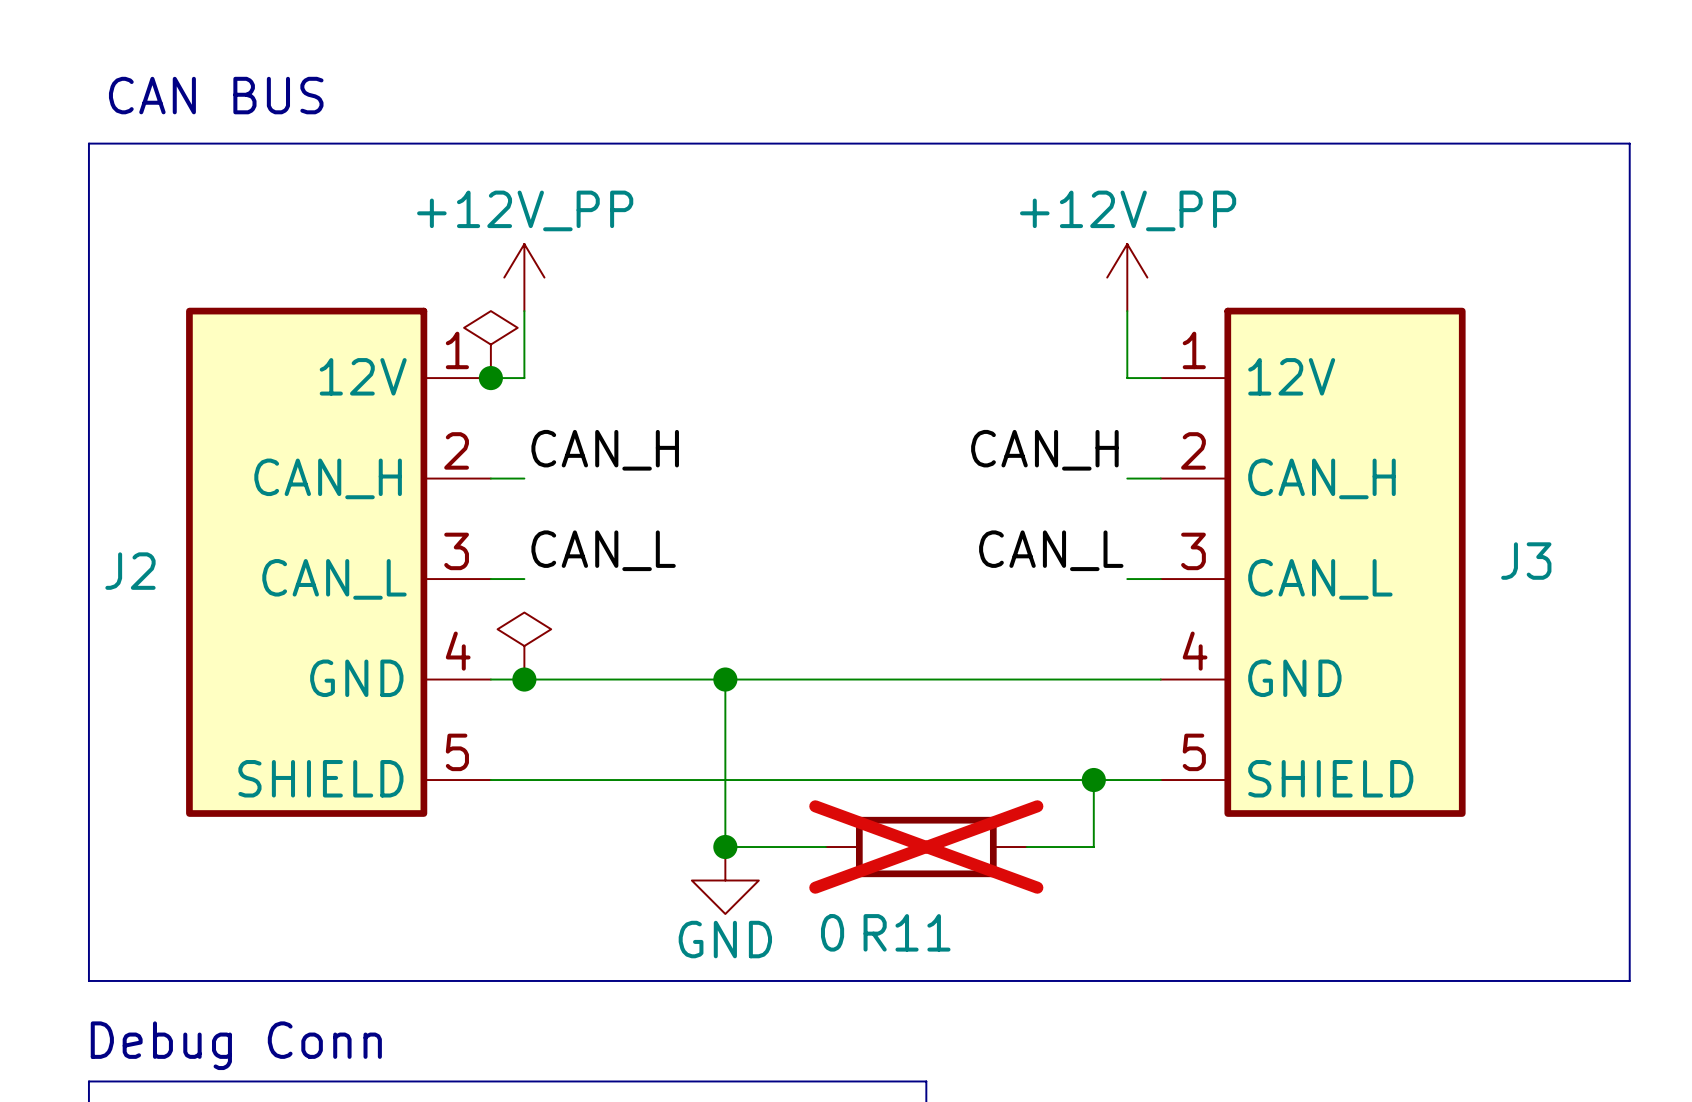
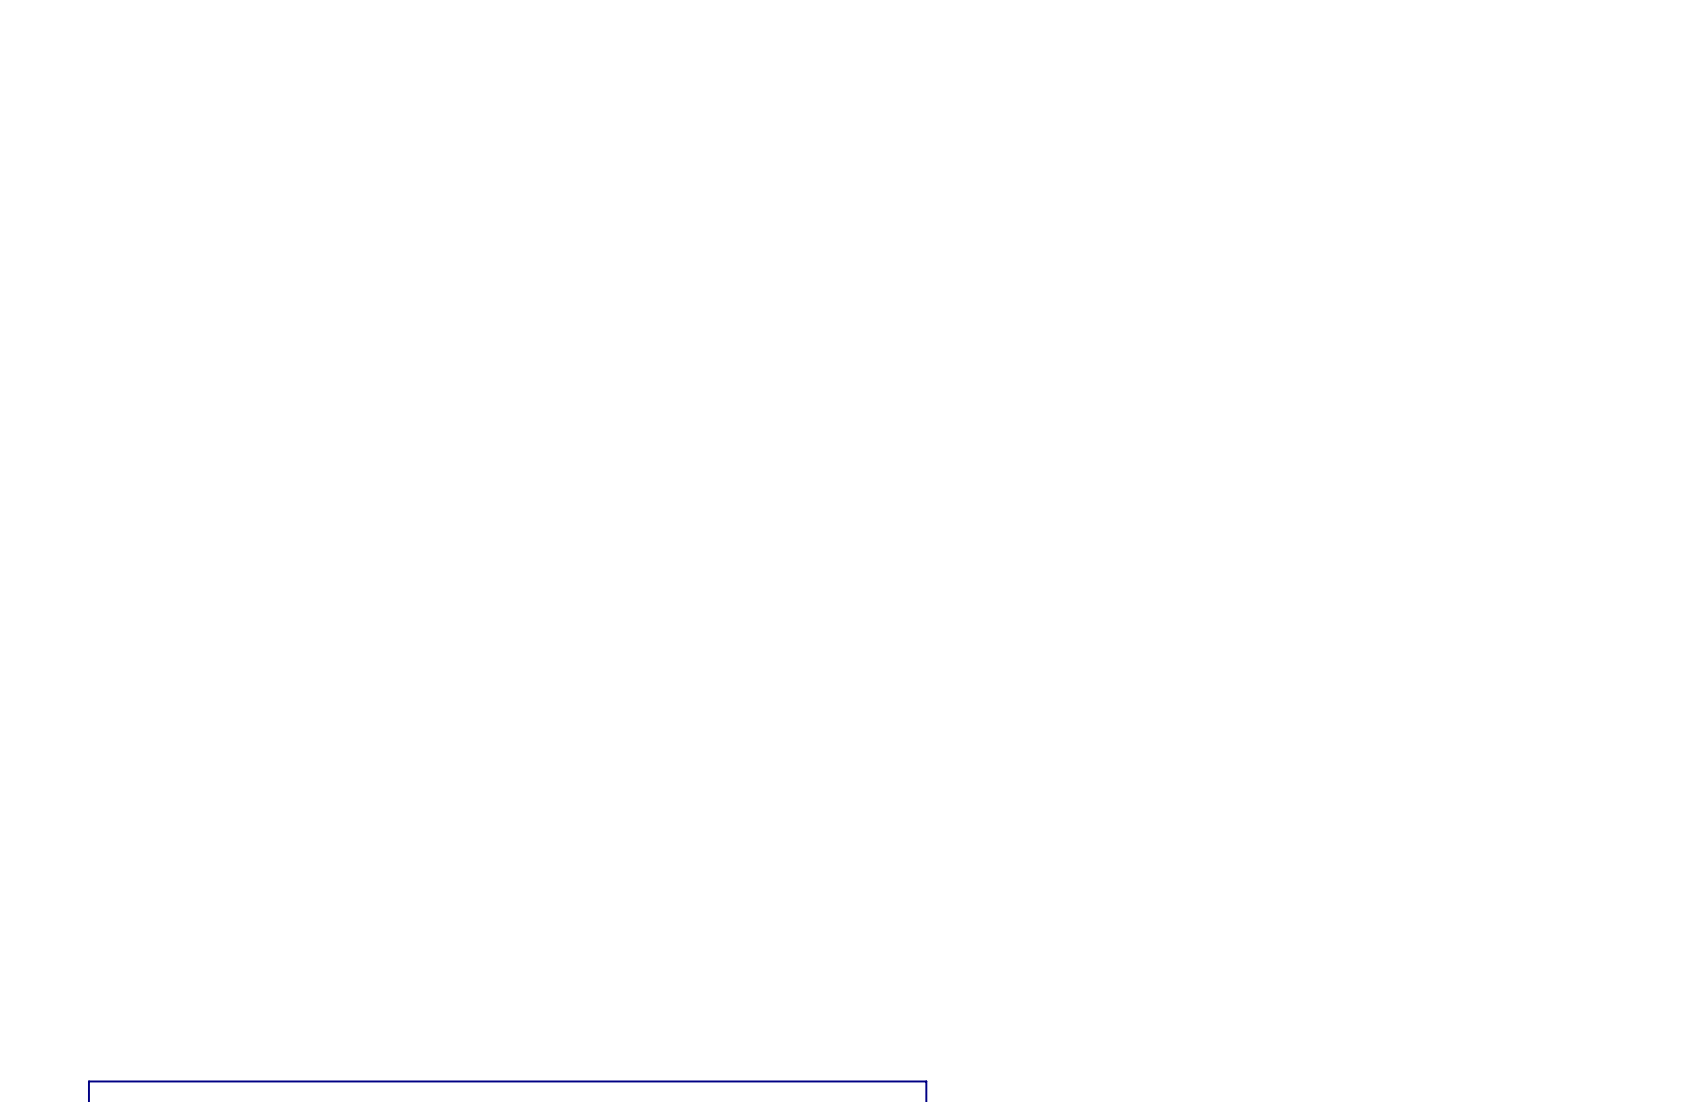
text: CAN BUS (216, 95) -> none
line: (88, 143) (1629, 143) (1629, 980) (88, 980) (88, 143) -> none
power symbol: +12V_PP (524, 277) -> none
power symbol: +12V_PP (1127, 277) -> none
wire: (524, 311) (524, 378) (490, 378) -> none
wire: (1127, 311) (1127, 378) (1160, 378) -> none
power symbol: (490, 344) -> none
junction: (490, 378) -> none
label: CAN_H (605, 450) -> none
label: CAN_H (1044, 450) -> none
wire: (490, 478) (524, 478) -> none
wire: (1127, 478) (1160, 478) -> none
label: CAN_L (603, 550) -> none
label: CAN_L (1051, 550) -> none
J2: (338, 562) -> none
J3: (1313, 562) -> none
wire: (490, 579) (524, 579) -> none
wire: (1127, 579) (1160, 579) -> none
power symbol: (524, 646) -> none
wire: (490, 679) (1160, 679) -> none
junction: (524, 679) -> none
wire: (725, 679) (725, 847) (825, 847) -> none
junction: (725, 679) -> none
wire: (490, 780) (1160, 780) -> none
wire: (1093, 780) (1093, 847) (1026, 847) -> none
junction: (1093, 780) -> none
junction: (725, 847) -> none
R11: 0 (926, 847) -> none
power symbol: GND (725, 880) -> none
text: Debug Conn (236, 1045) -> none

